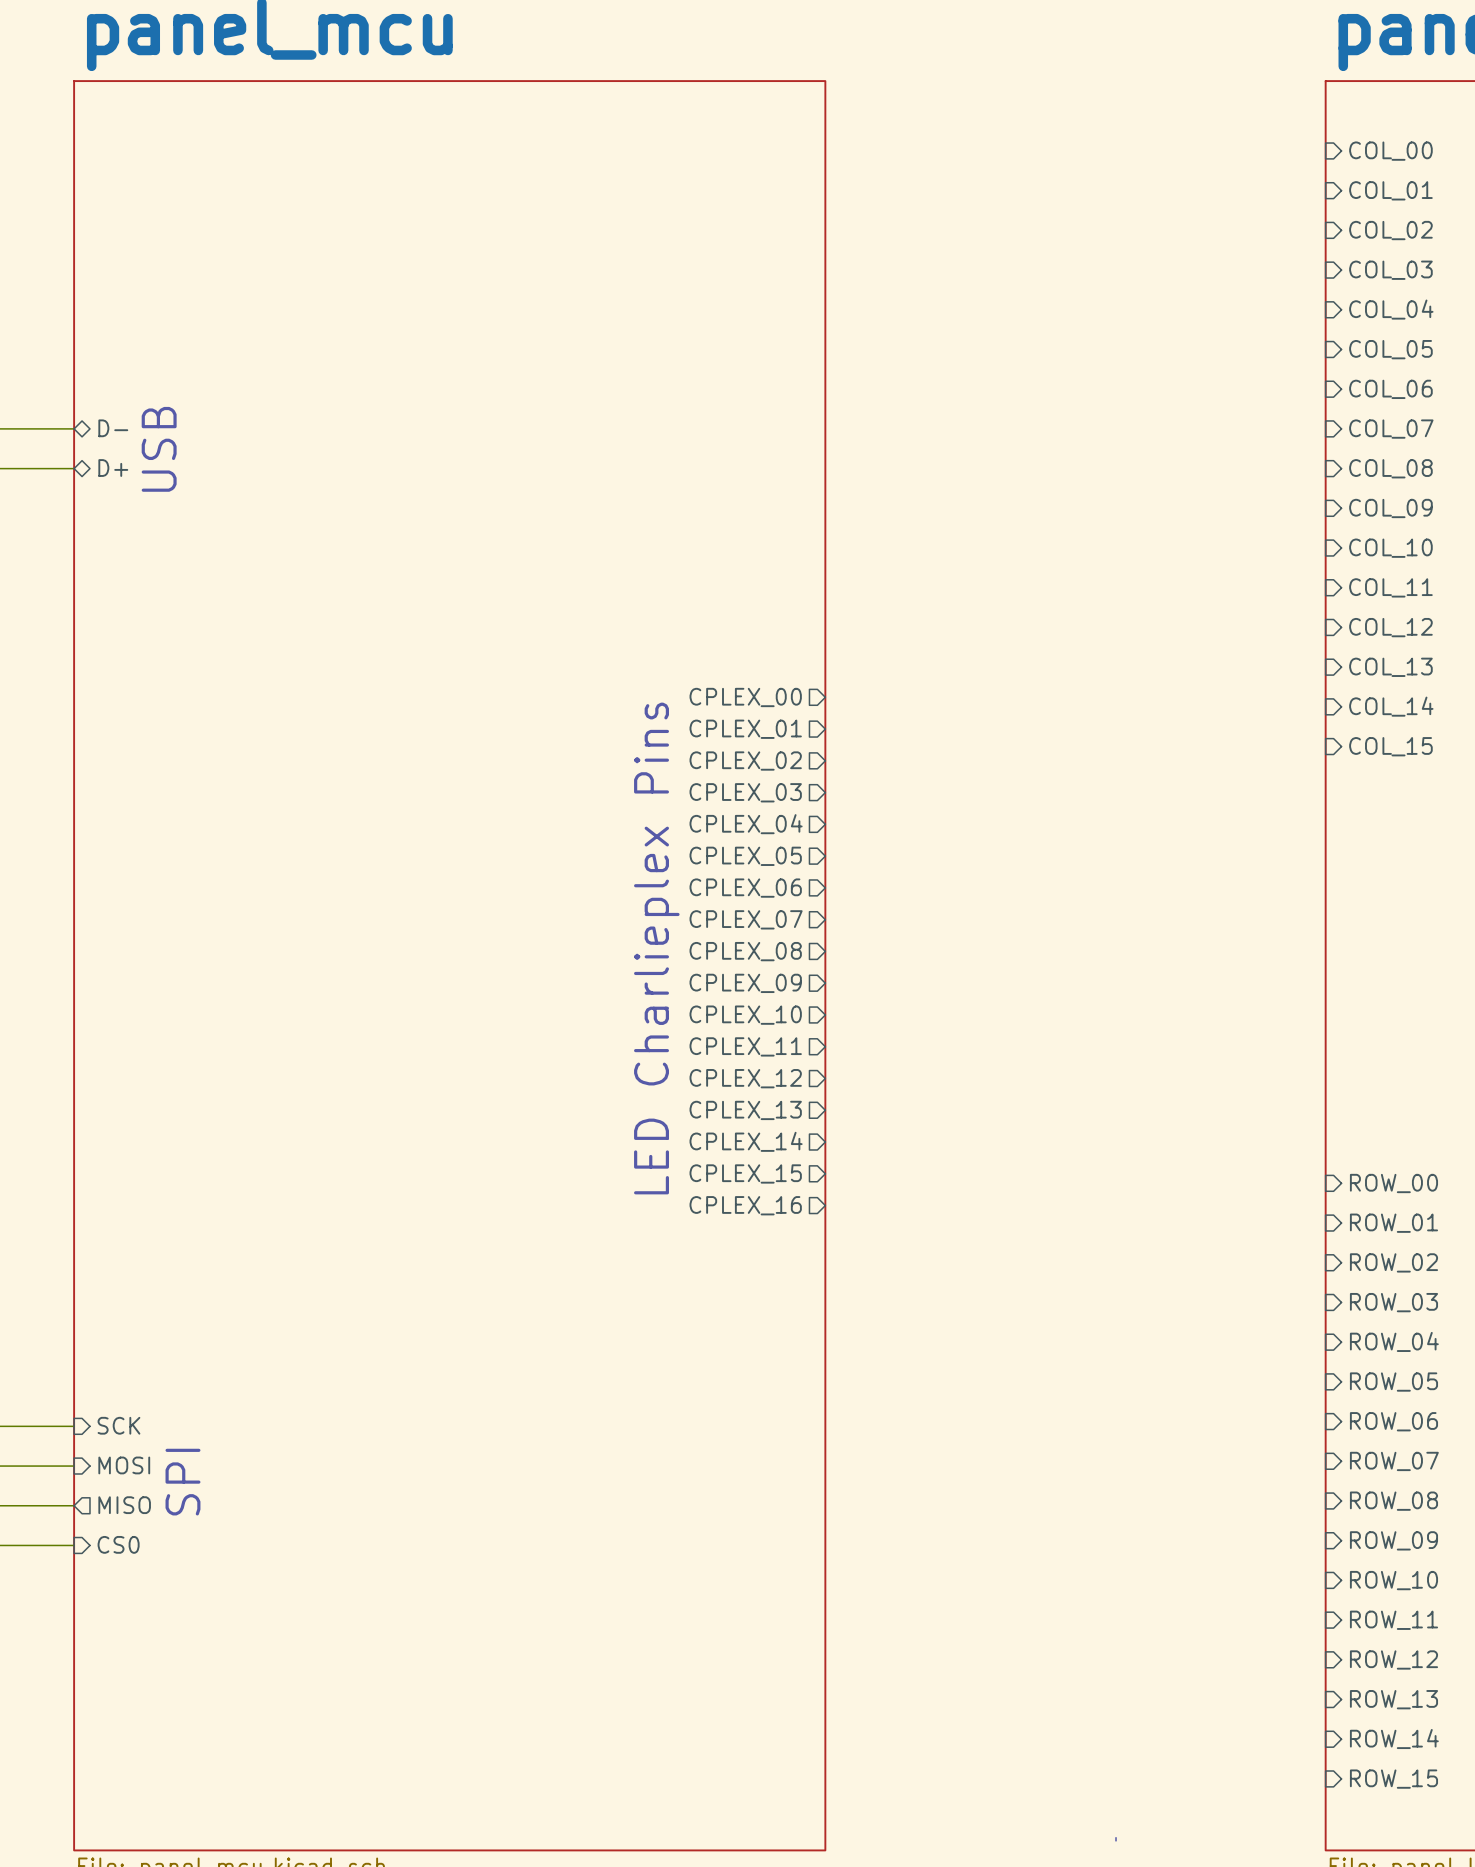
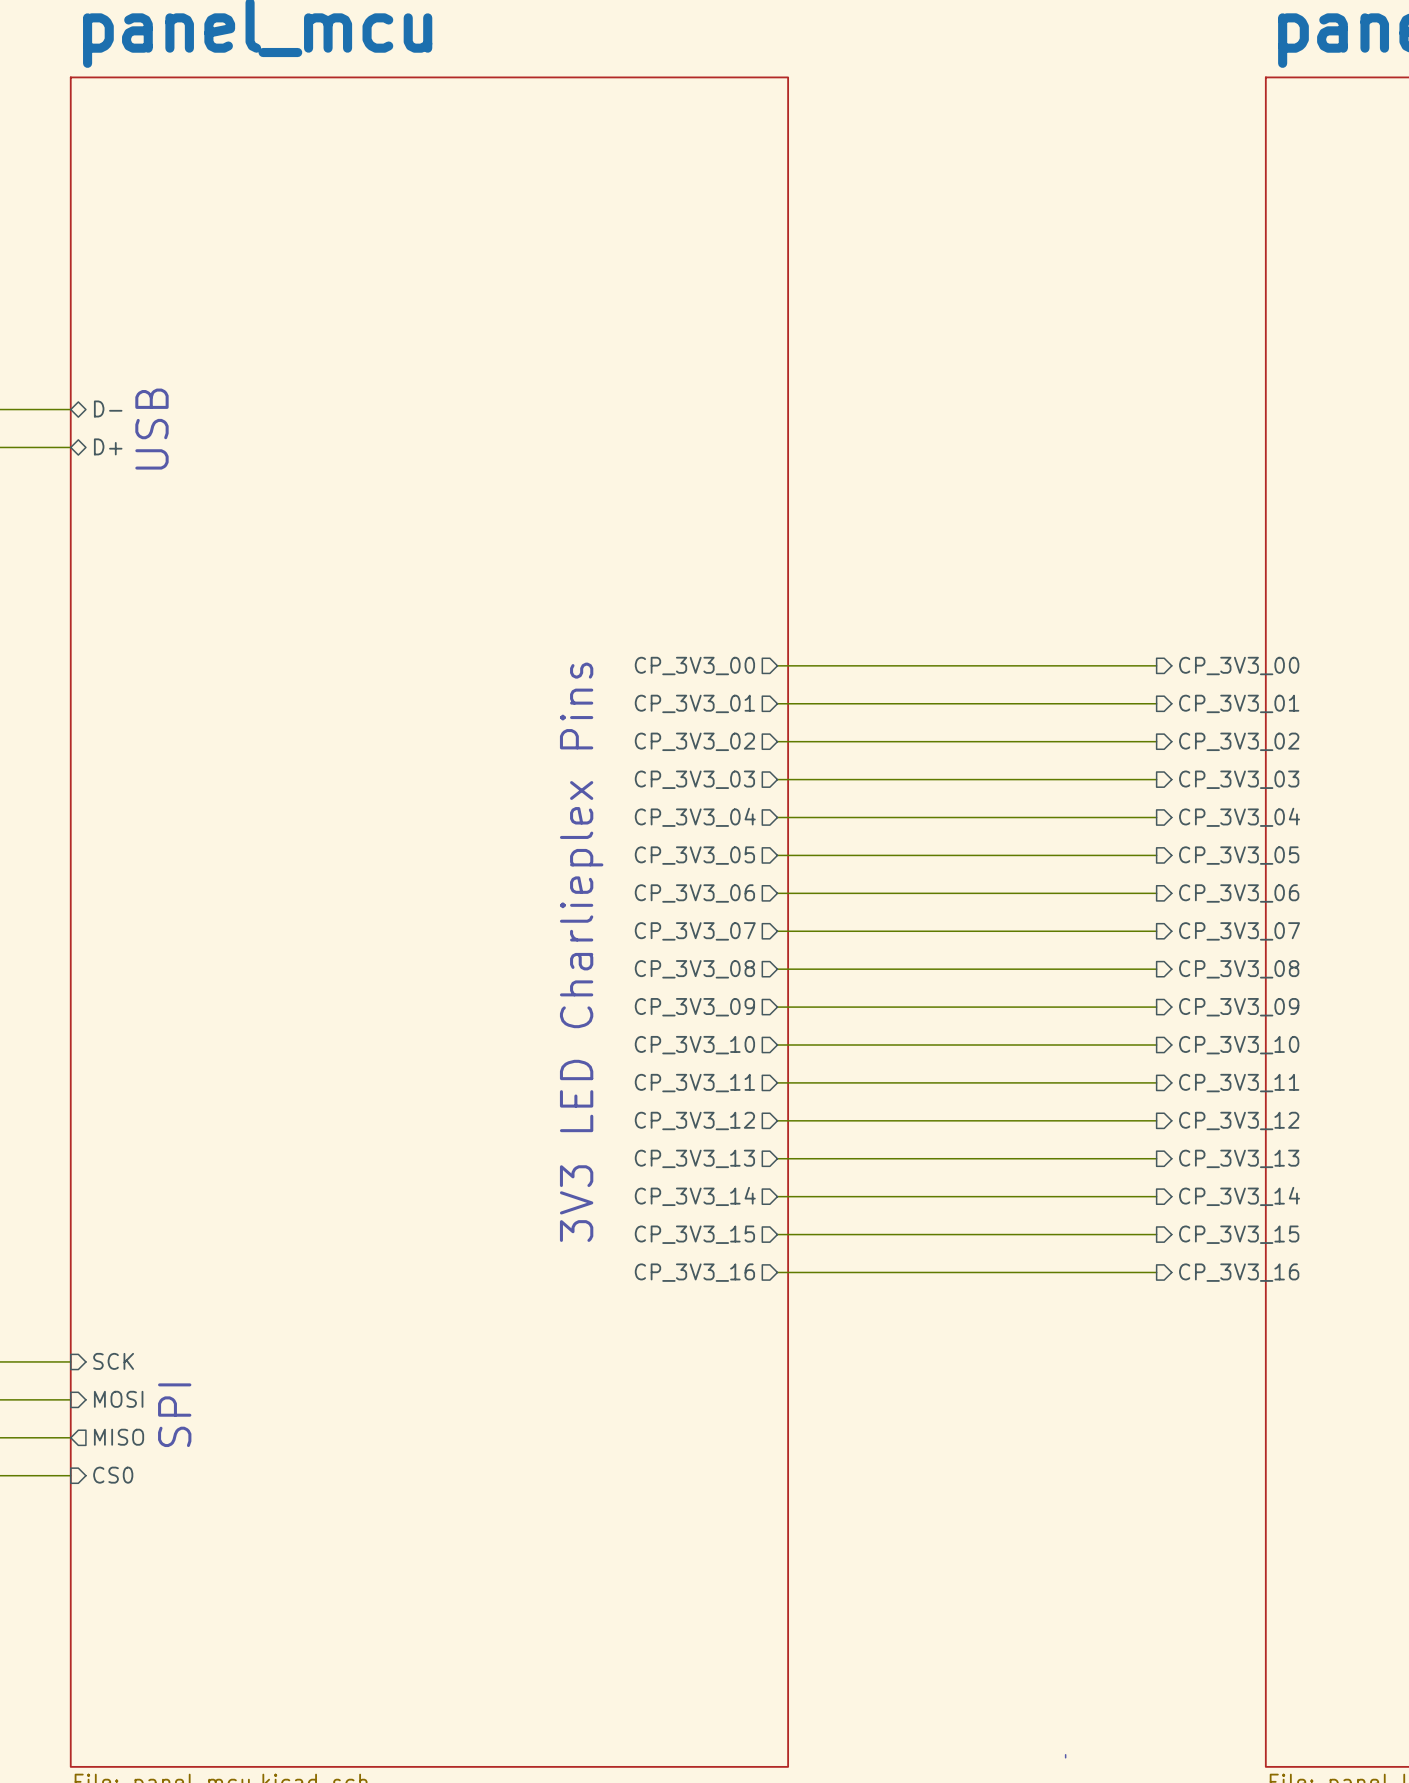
sheet pin: COL_00 (1390, 151) -> none
sheet pin: COL_01 (1390, 190) -> none
sheet pin: COL_02 (1390, 230) -> none
sheet pin: COL_03 (1390, 270) -> none
sheet pin: COL_04 (1391, 309) -> none
sheet pin: COL_05 (1390, 349) -> none
sheet pin: COL_06 (1390, 389) -> none
sheet pin: COL_07 (1391, 429) -> none
sheet pin: COL_08 (1390, 468) -> none
sheet pin: COL_09 (1390, 508) -> none
sheet pin: COL_10 (1390, 548) -> none
sheet pin: COL_11 (1390, 587) -> none
sheet pin: COL_12 (1390, 627) -> none
sheet pin: COL_13 (1390, 667) -> none
sheet pin: CPLEX_00 (745, 697) -> CP_3V3_00 (694, 666)
wire: none -> (777, 665) (1156, 665)
sheet pin: none -> CP_3V3_00 (1239, 666)
sheet pin: COL_14 (1391, 706) -> none
sheet pin: CPLEX_01 (745, 729) -> none
sheet pin: none -> CP_3V3_01 (694, 703)
wire: none -> (777, 703) (1156, 703)
sheet pin: none -> CP_3V3_01 (1239, 703)
sheet pin: COL_15 (1390, 746) -> none
sheet pin: CPLEX_02 (745, 761) -> none
sheet pin: none -> CP_3V3_02 (694, 741)
wire: none -> (777, 741) (1156, 741)
sheet pin: none -> CP_3V3_02 (1239, 741)
sheet pin: CPLEX_03 (745, 792) -> none
sheet pin: none -> CP_3V3_03 (694, 779)
wire: none -> (777, 779) (1156, 779)
sheet pin: none -> CP_3V3_03 (1239, 779)
sheet pin: CPLEX_04 (746, 824) -> none
sheet pin: none -> CP_3V3_04 (1239, 817)
sheet pin: CPLEX_05 (745, 856) -> CP_3V3_04 (695, 817)
wire: none -> (777, 817) (1156, 817)
sheet pin: CPLEX_06 (745, 888) -> none
wire: none -> (777, 855) (1156, 855)
sheet pin: none -> CP_3V3_05 (694, 855)
sheet pin: none -> CP_3V3_05 (1239, 855)
sheet pin: CPLEX_07 (746, 919) -> none
sheet pin: none -> CP_3V3_06 (694, 893)
wire: none -> (777, 893) (1156, 893)
sheet pin: none -> CP_3V3_06 (1239, 893)
text: LED Charlieplex Pins (656, 948) -> 3V3 LED Charlieplex Pins (581, 952)
sheet pin: CPLEX_08 (745, 951) -> none
sheet pin: none -> CP_3V3_07 (695, 931)
wire: none -> (777, 931) (1156, 931)
sheet pin: none -> CP_3V3_07 (1239, 931)
sheet pin: CPLEX_09 (745, 983) -> none
wire: none -> (777, 969) (1156, 969)
sheet pin: CPLEX_10 (745, 1015) -> CP_3V3_08 (694, 969)
sheet pin: none -> CP_3V3_08 (1239, 969)
sheet pin: CPLEX_11 (745, 1046) -> none
sheet pin: none -> CP_3V3_09 (694, 1007)
wire: none -> (777, 1007) (1156, 1007)
sheet pin: none -> CP_3V3_09 (1239, 1007)
sheet pin: CPLEX_12 (745, 1078) -> none
sheet pin: none -> CP_3V3_10 (694, 1045)
wire: none -> (777, 1044) (1156, 1044)
sheet pin: none -> CP_3V3_10 (1239, 1045)
sheet pin: CPLEX_13 (745, 1110) -> none
sheet pin: none -> CP_3V3_11 (694, 1083)
wire: none -> (777, 1082) (1156, 1082)
sheet pin: none -> CP_3V3_11 (1239, 1083)
sheet pin: CPLEX_14 (746, 1141) -> none
sheet pin: CPLEX_15 (745, 1173) -> CP_3V3_12 (694, 1120)
wire: none -> (777, 1120) (1156, 1120)
sheet pin: none -> CP_3V3_12 (1239, 1120)
sheet pin: ROW_00 (1393, 1183) -> none
sheet pin: CPLEX_16 (745, 1205) -> none
sheet pin: none -> CP_3V3_13 (694, 1158)
wire: none -> (777, 1158) (1156, 1158)
sheet pin: none -> CP_3V3_13 (1239, 1158)
sheet pin: ROW_01 (1393, 1223) -> none
sheet pin: none -> CP_3V3_14 (695, 1196)
wire: none -> (777, 1196) (1156, 1196)
sheet pin: none -> CP_3V3_14 (1239, 1196)
sheet pin: ROW_02 (1393, 1262) -> none
wire: none -> (777, 1234) (1156, 1234)
sheet pin: none -> CP_3V3_15 (694, 1234)
sheet pin: none -> CP_3V3_15 (1239, 1234)
sheet pin: ROW_03 (1393, 1302) -> none
sheet pin: none -> CP_3V3_16 (694, 1272)
wire: none -> (777, 1272) (1156, 1272)
sheet pin: none -> CP_3V3_16 (1239, 1272)
sheet pin: ROW_04 (1394, 1341) -> none
sheet pin: ROW_05 (1393, 1382) -> none
sheet pin: ROW_06 (1393, 1421) -> none
sheet pin: ROW_07 (1394, 1461) -> none
sheet pin: ROW_08 (1393, 1501) -> none
sheet pin: ROW_09 (1393, 1540) -> none
sheet pin: ROW_10 (1393, 1580) -> none
sheet pin: ROW_11 (1393, 1620) -> none
sheet pin: ROW_12 (1393, 1659) -> none
sheet pin: ROW_13 (1393, 1699) -> none
sheet pin: ROW_14 (1394, 1739) -> none
sheet pin: ROW_15 (1393, 1779) -> none

